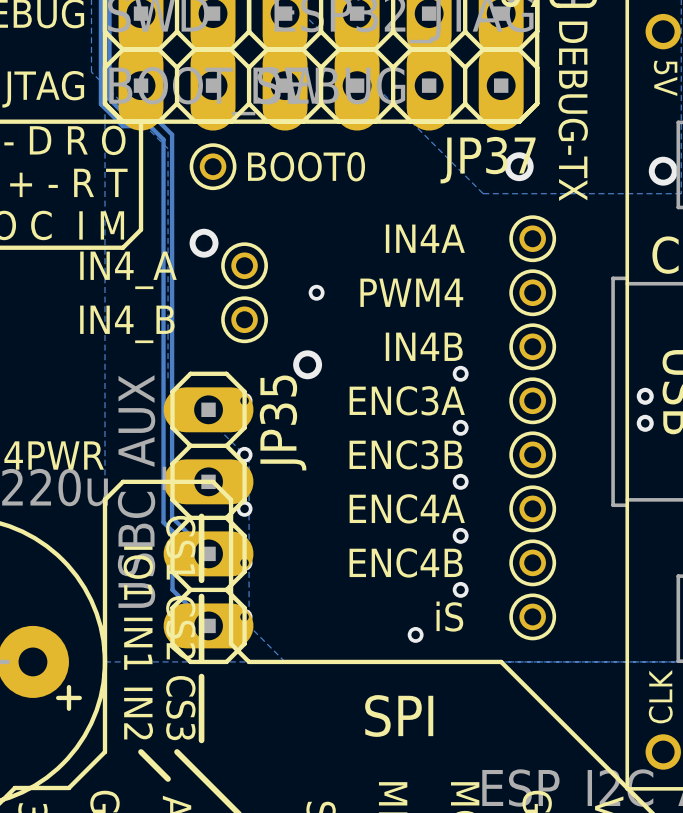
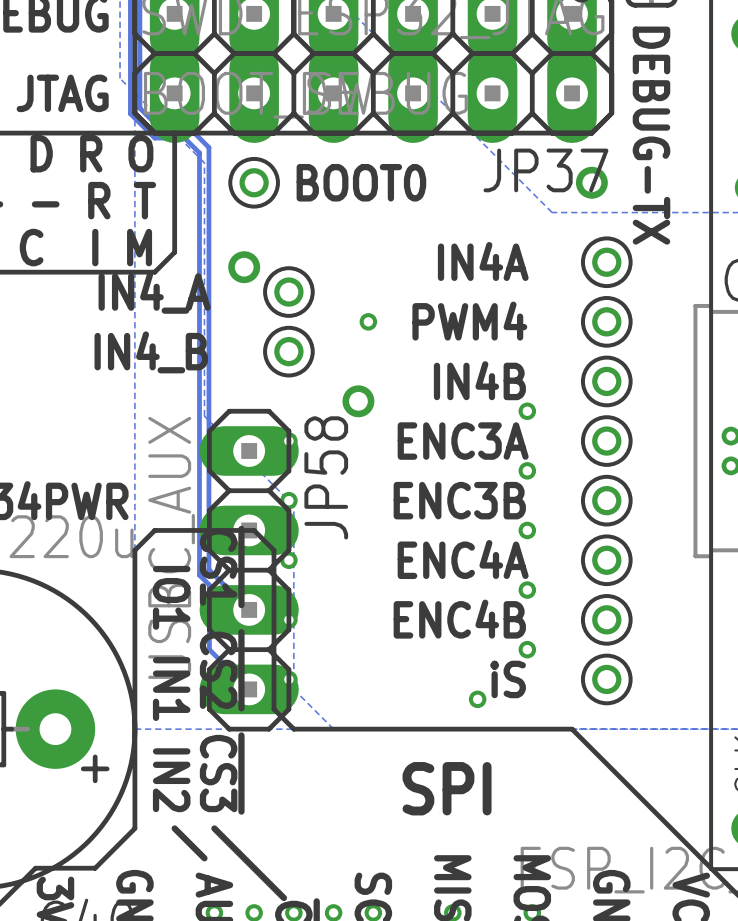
JP35 name: JP35 (283, 422) -> JP58 (326, 477)

